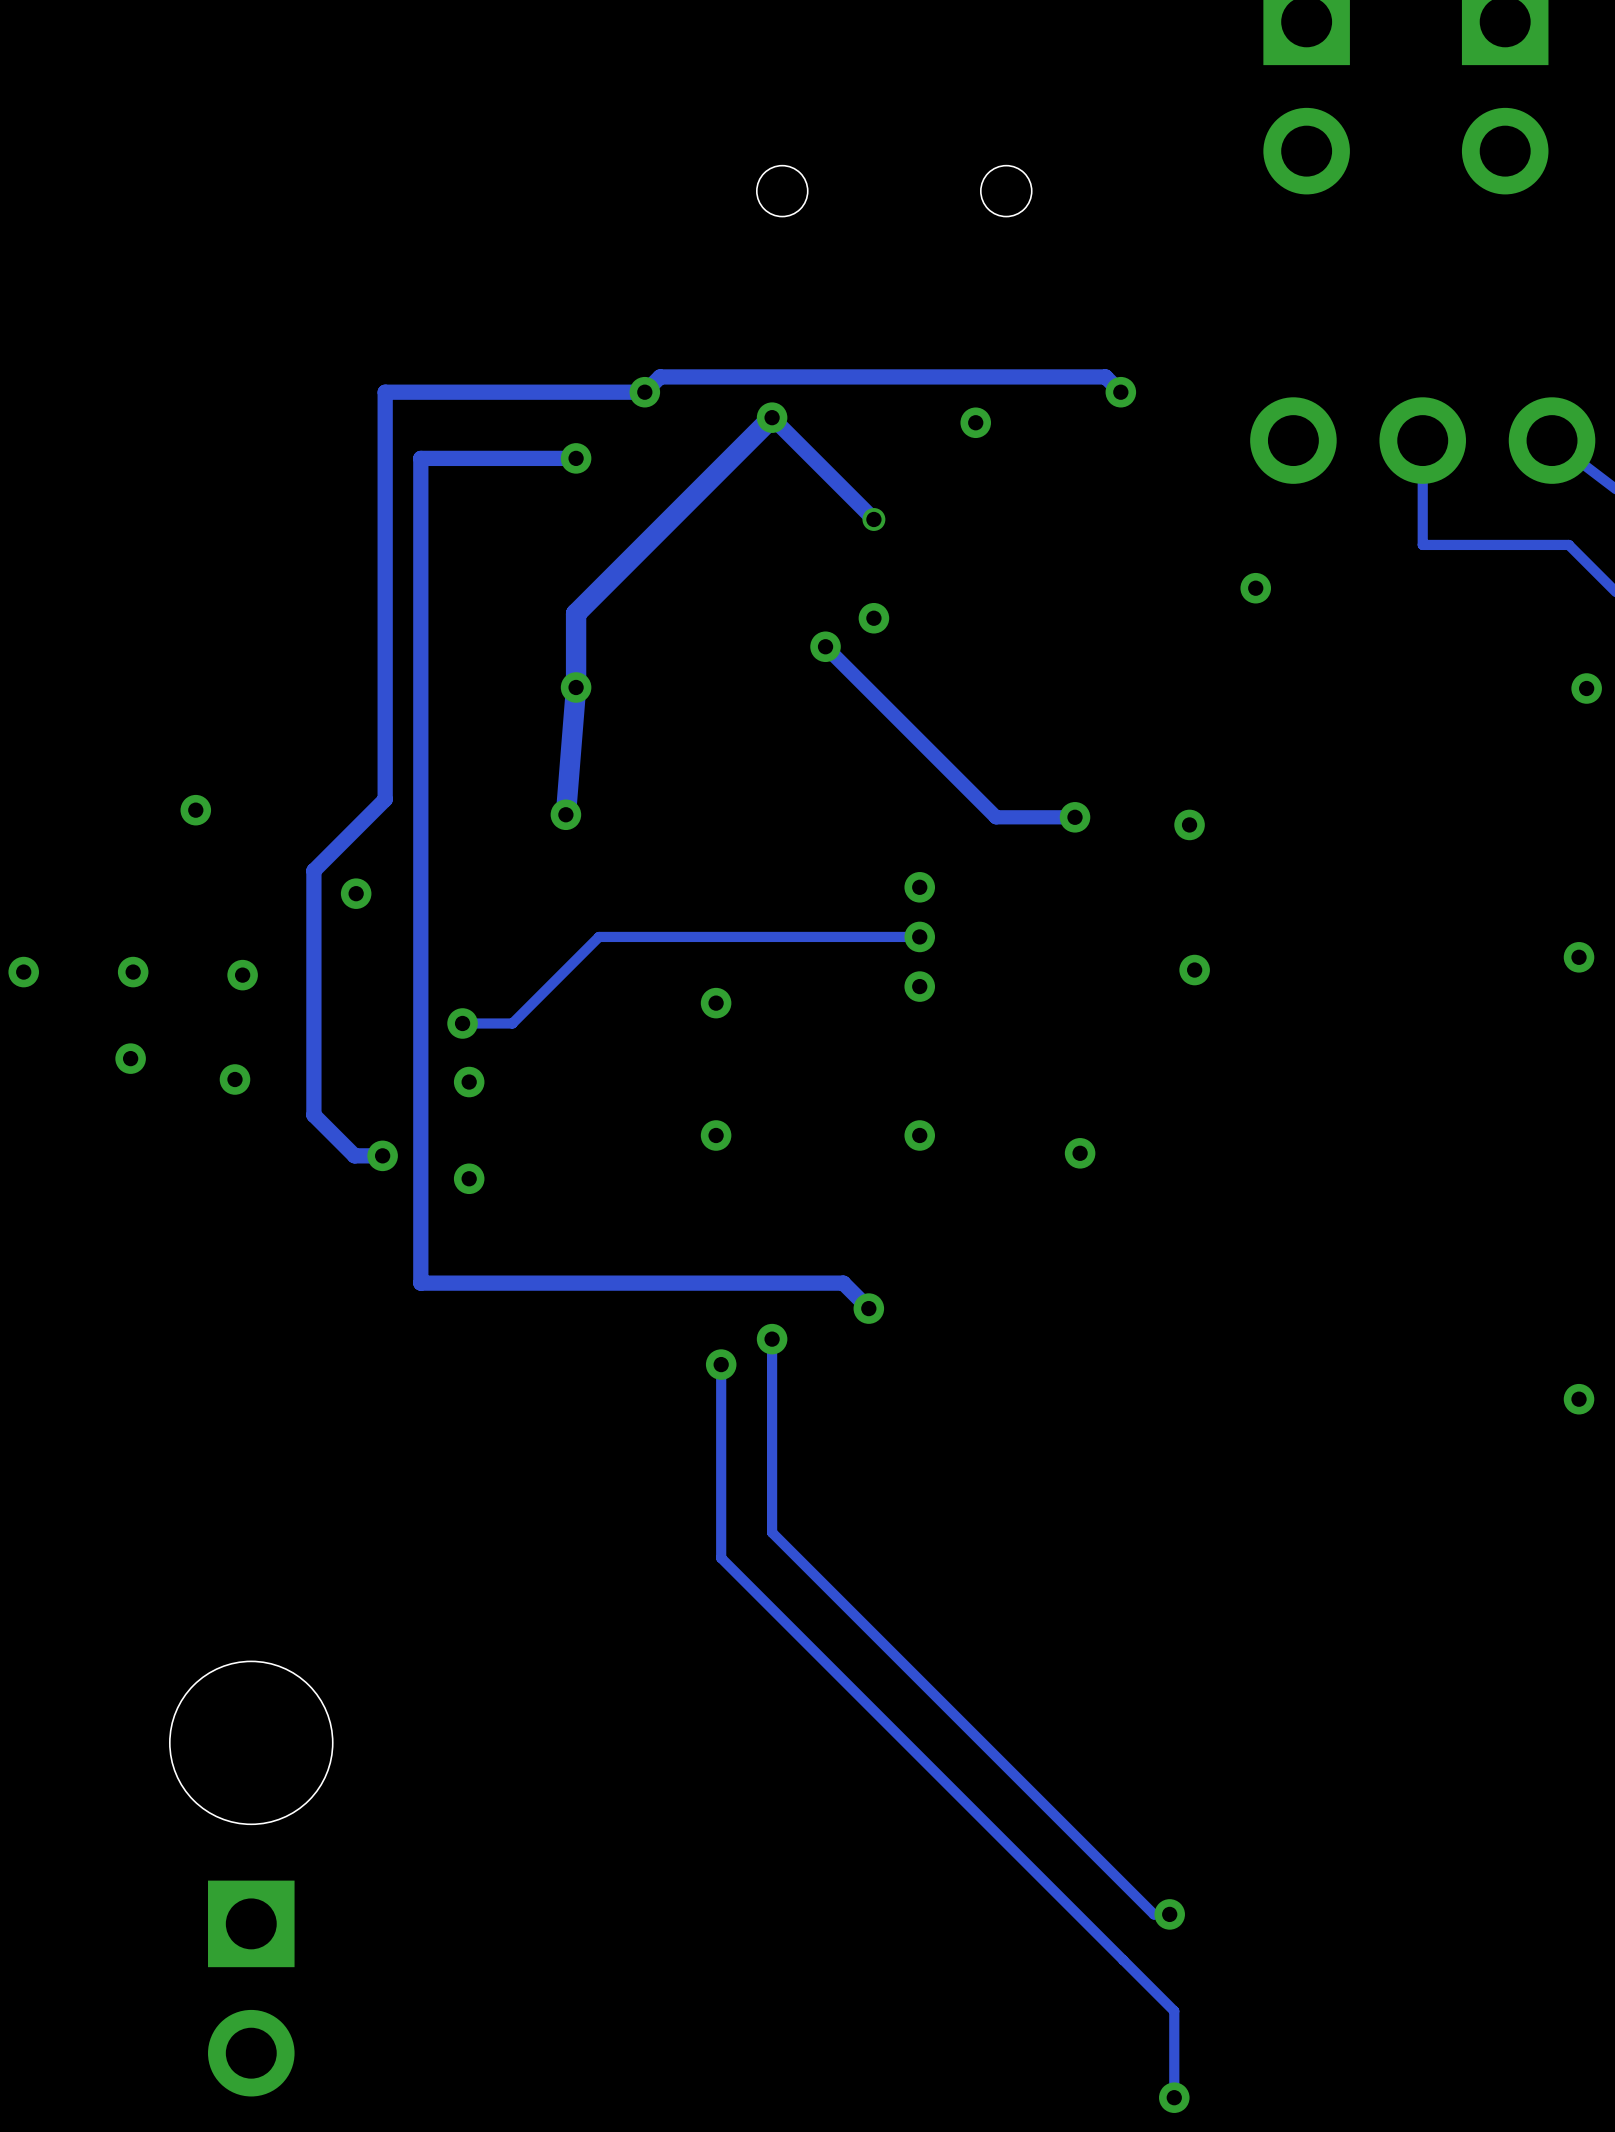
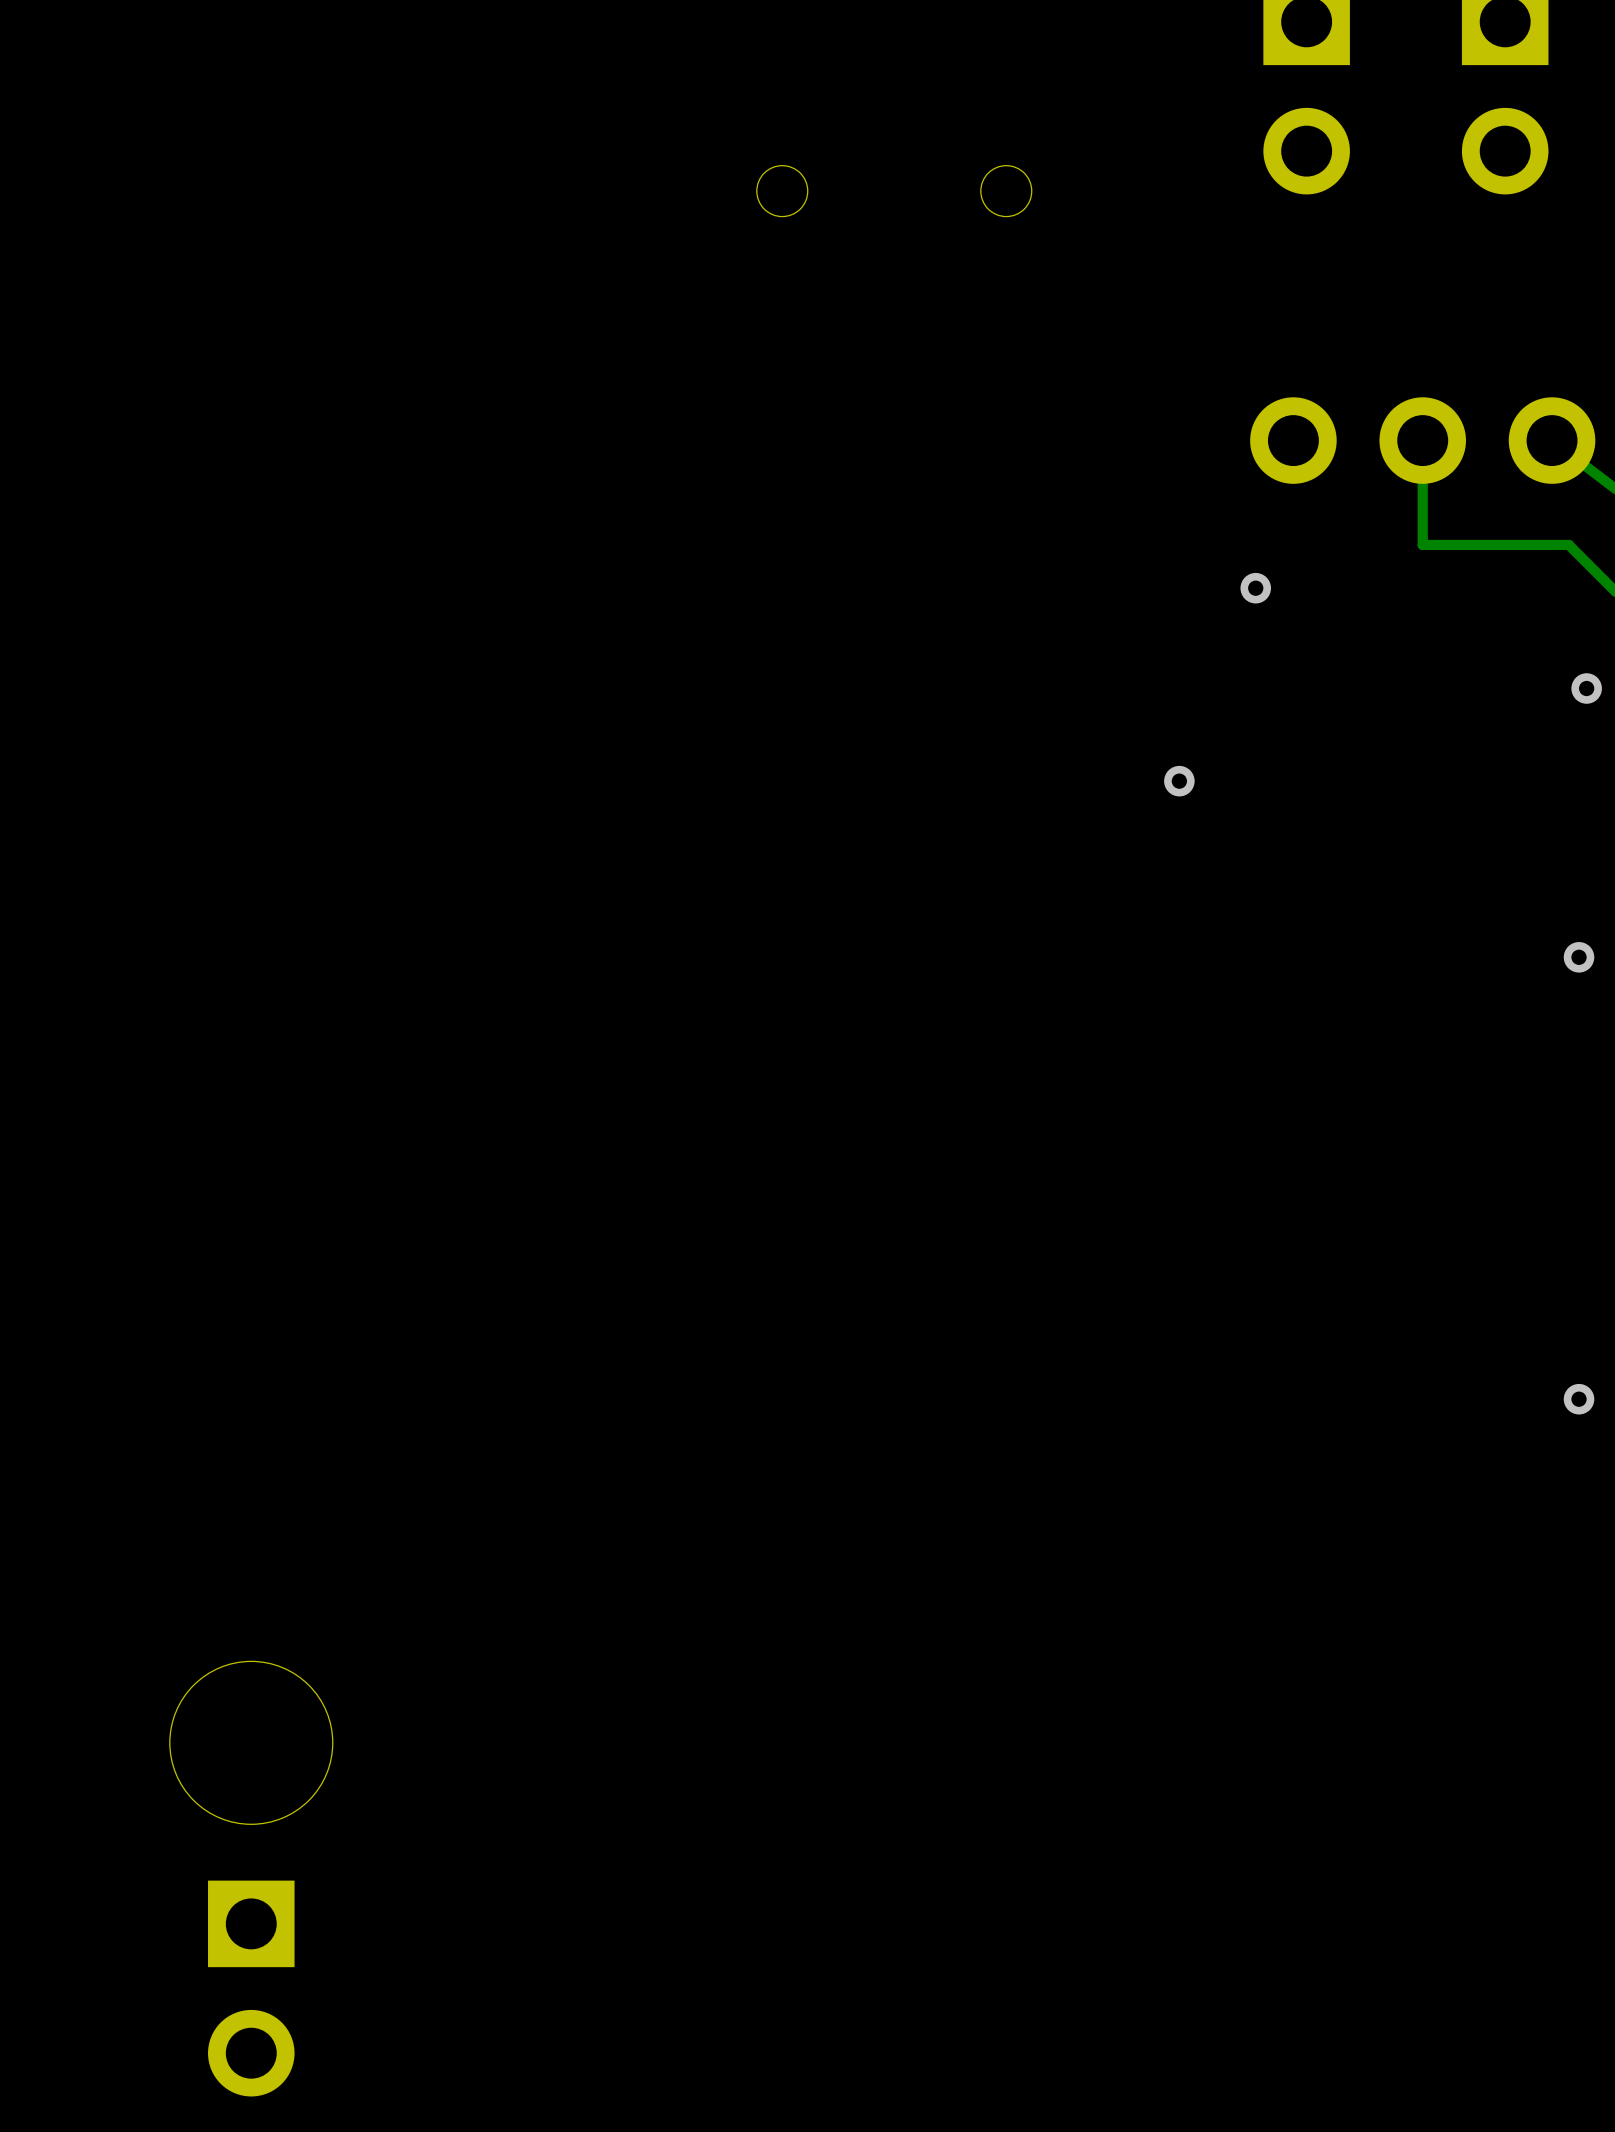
via: (644, 392) -> none
track: (1120, 392) (1105, 376) (660, 376) (644, 392) (385, 392) (385, 799) (313, 870) (313, 1115) (354, 1155) (382, 1155) -> none
via: (1120, 392) -> none
via: (772, 417) -> none
via: (975, 422) -> none
track: (576, 458) (420, 458) (420, 1283) (843, 1283) (868, 1308) -> none
via: (576, 458) -> none
track: (873, 519) (772, 417) (576, 613) (576, 687) (565, 814) -> none
via: (873, 519) -> none
via: (873, 618) -> none
track: (825, 646) (996, 817) (1075, 817) -> none
via: (825, 646) -> none
via: (576, 687) -> none
via: (195, 810) -> none
via: (565, 814) -> none
via: (1075, 817) -> none
via position: (1189, 824) -> (1179, 781)
via: (919, 887) -> none
via: (356, 893) -> none
track: (919, 936) (599, 936) (512, 1023) (462, 1023) -> none
via: (919, 936) -> none
via: (1194, 970) -> none
via: (23, 972) -> none
via: (133, 972) -> none
via: (242, 975) -> none
via: (919, 986) -> none
via: (716, 1003) -> none
via: (462, 1023) -> none
via: (130, 1058) -> none
via: (234, 1079) -> none
via: (469, 1082) -> none
via: (716, 1135) -> none
via: (919, 1135) -> none
via: (1080, 1153) -> none
via: (382, 1155) -> none
via: (469, 1178) -> none
via: (868, 1308) -> none
track: (772, 1339) (772, 1532) (1153, 1914) (1169, 1914) -> none
via: (772, 1339) -> none
track: (721, 1364) (721, 1558) (1174, 2011) (1174, 2097) -> none
via: (721, 1364) -> none
via: (1169, 1914) -> none
via: (1174, 2097) -> none

